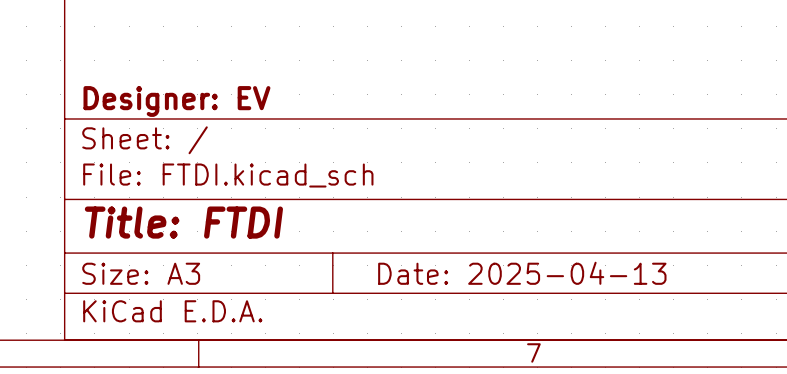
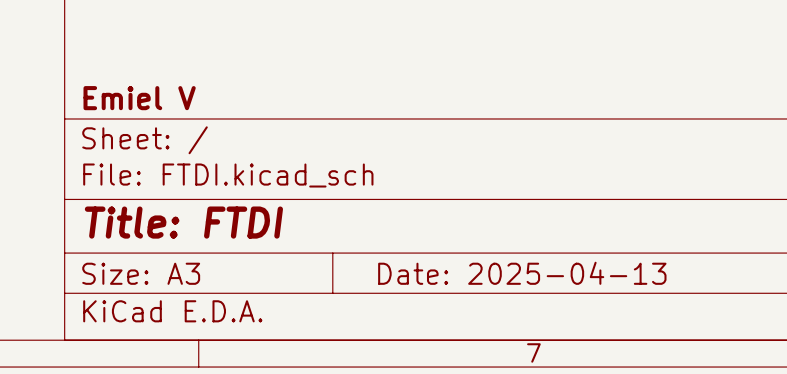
title block: Designer: EV (176, 101) -> Emiel V (139, 98)

